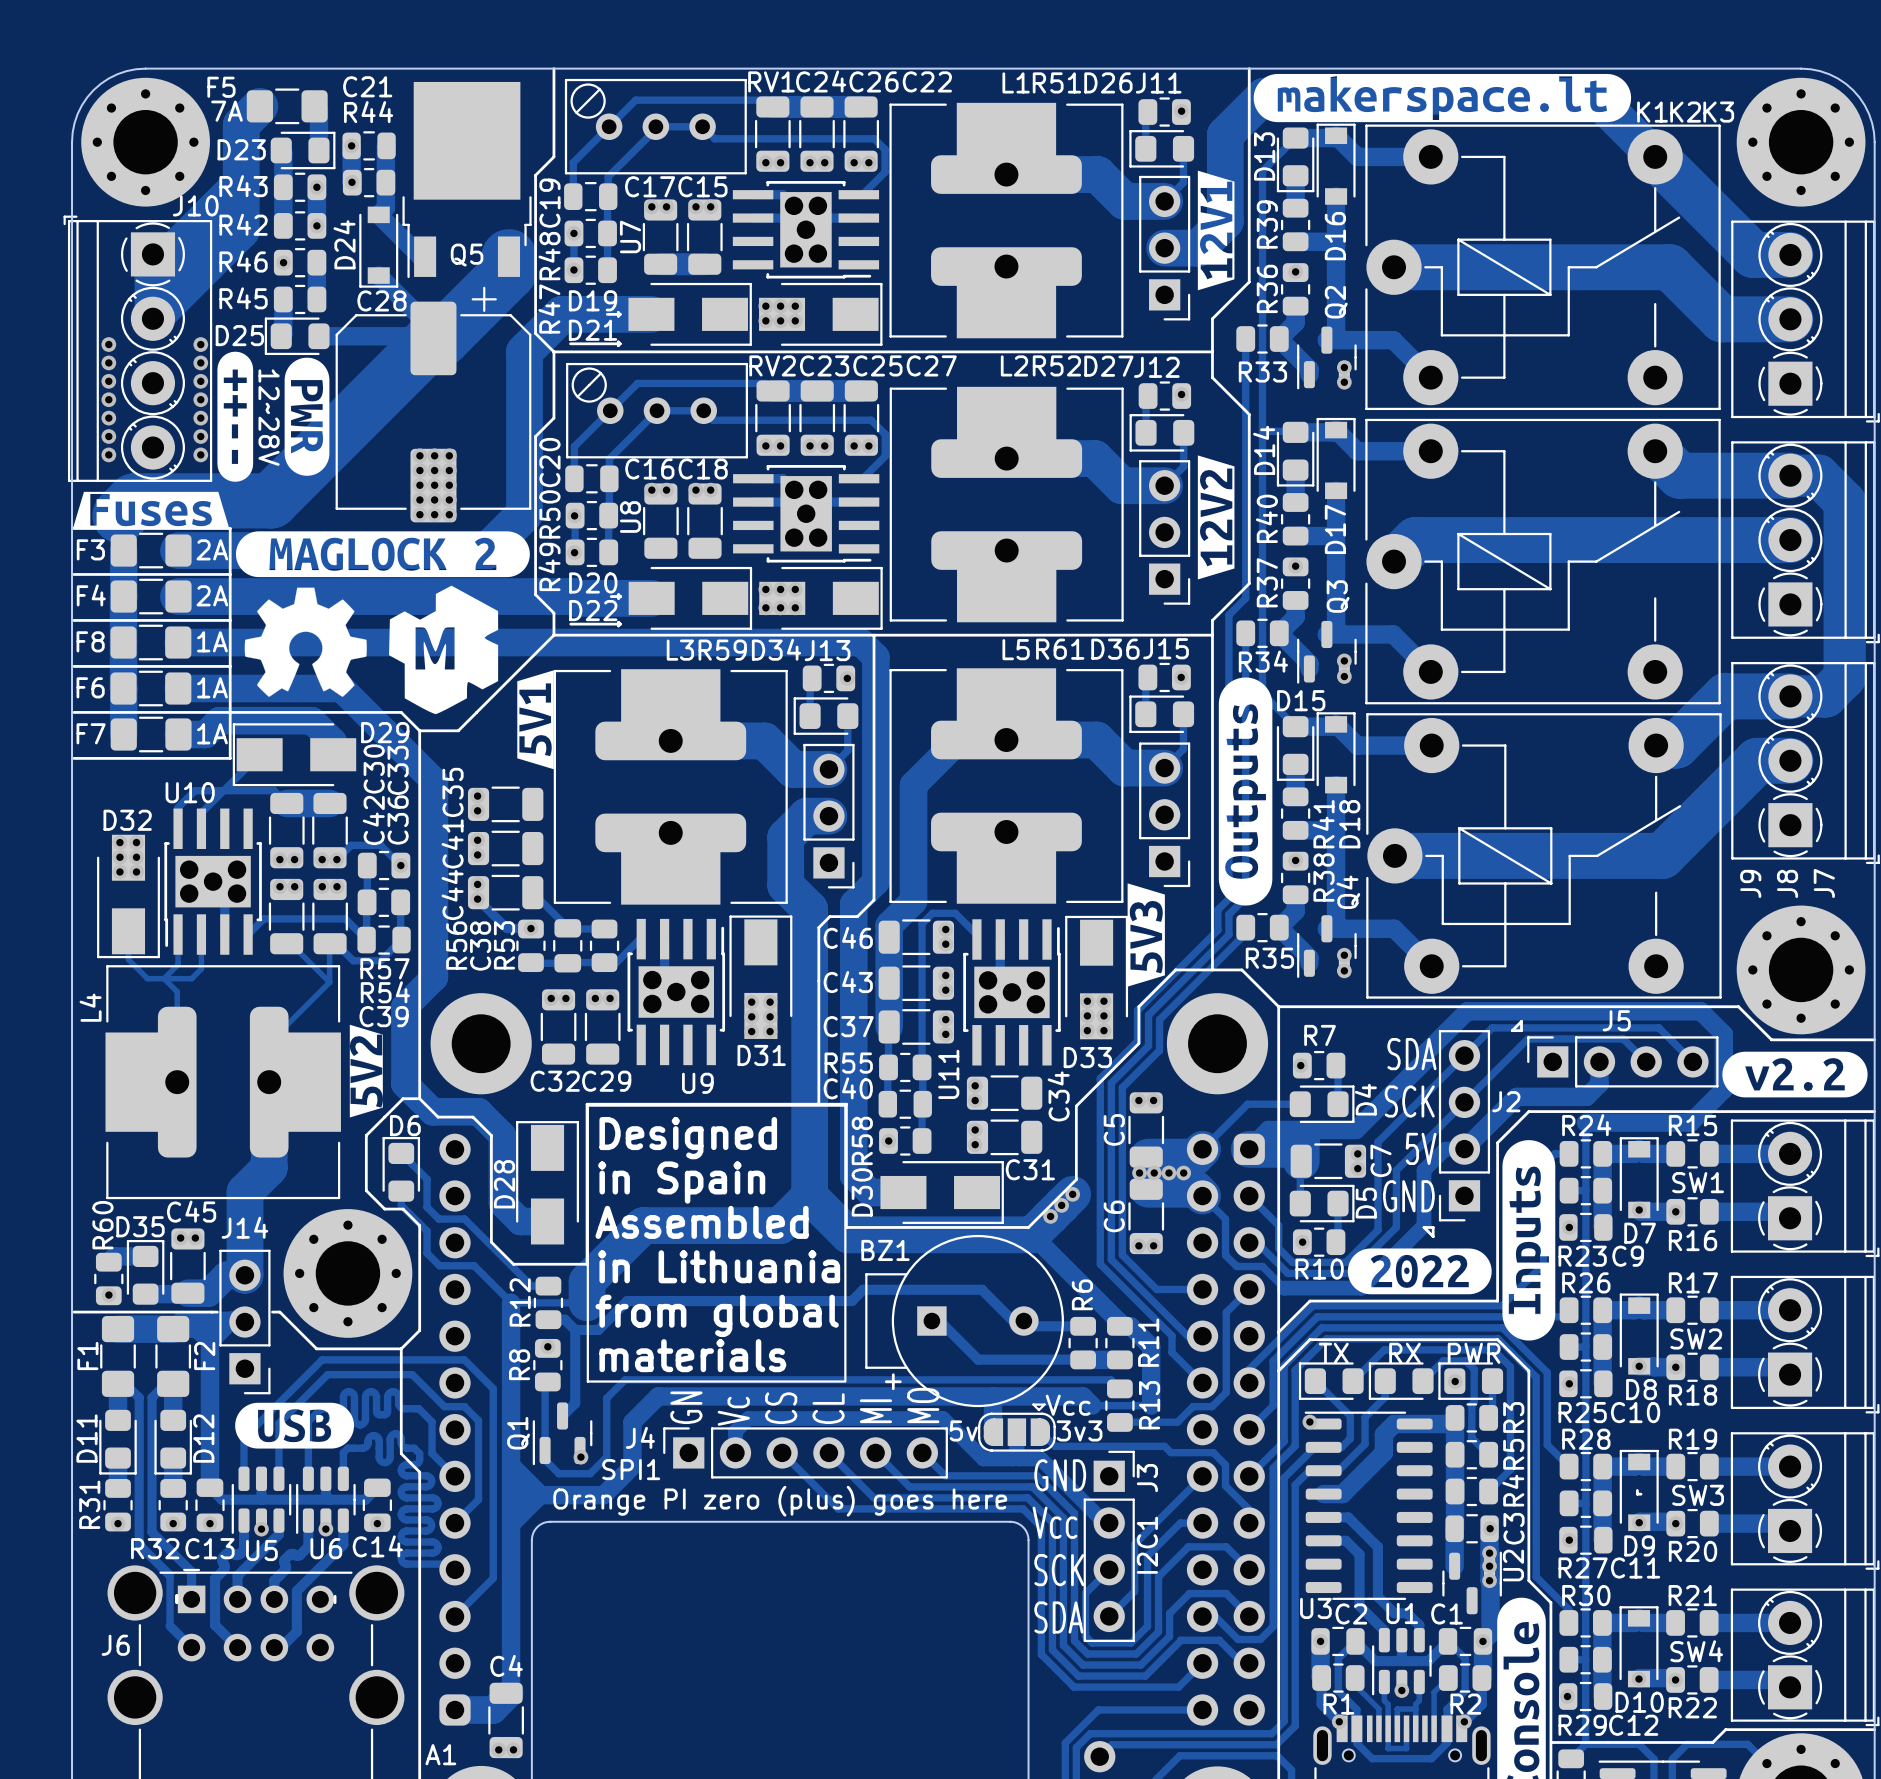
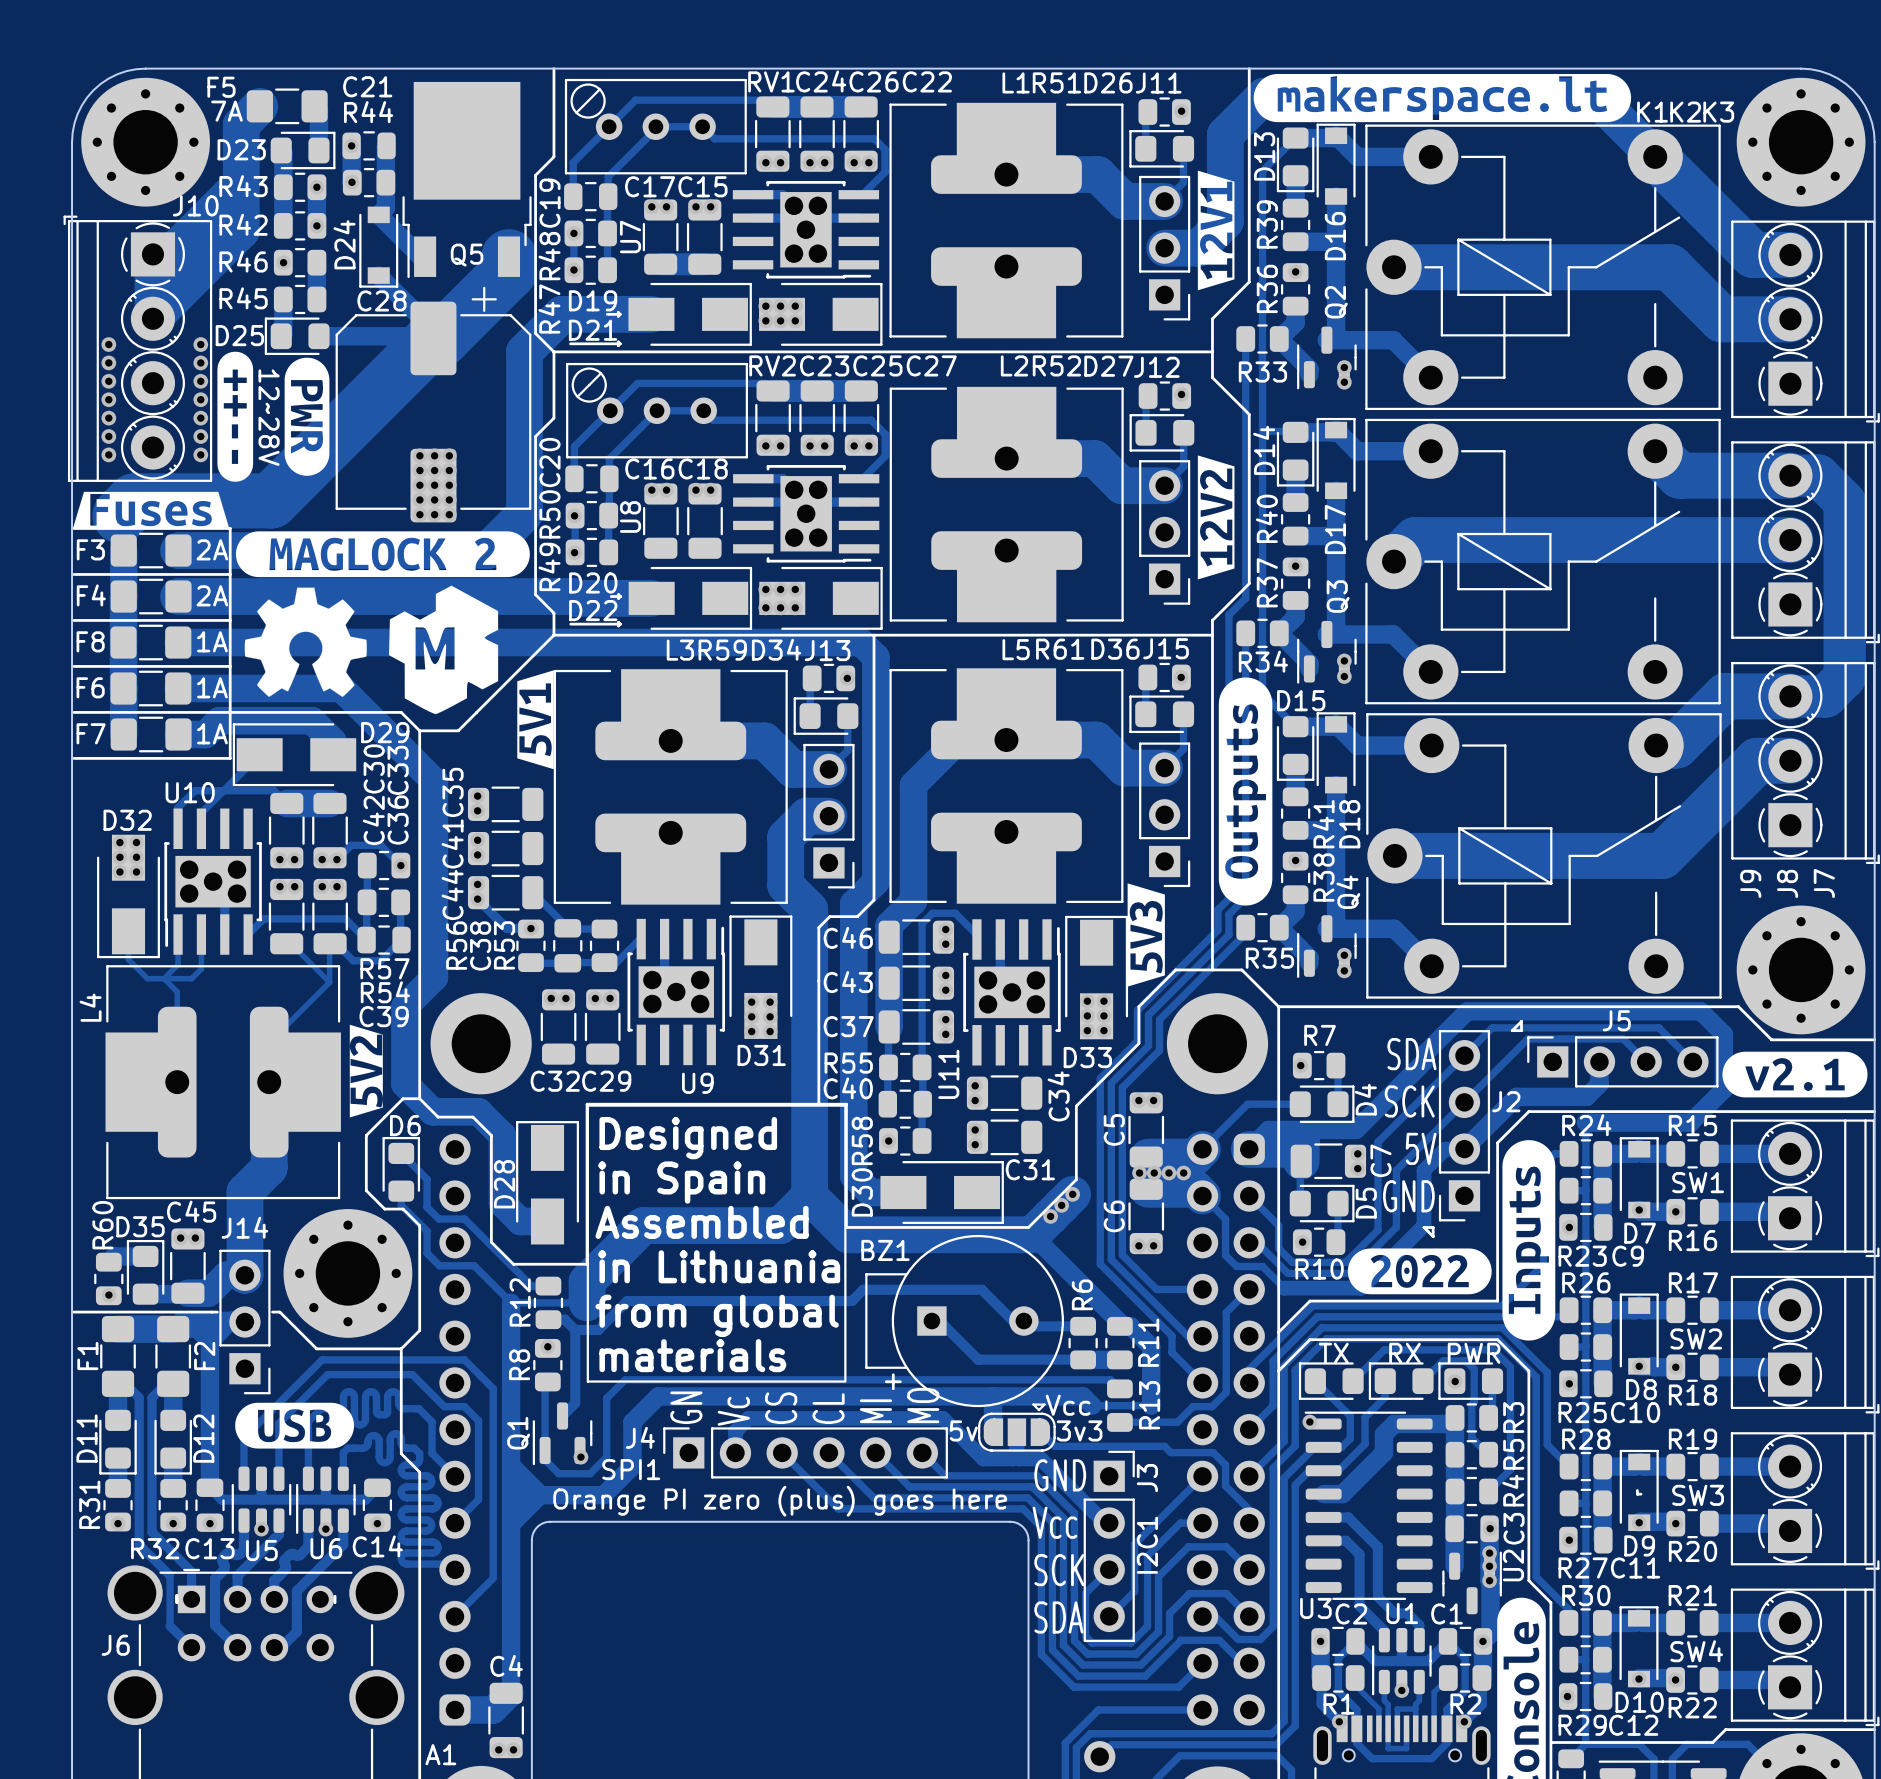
drawing shape: [1722, 1051, 1868, 1098] -> [1722, 1051, 1868, 1098]

